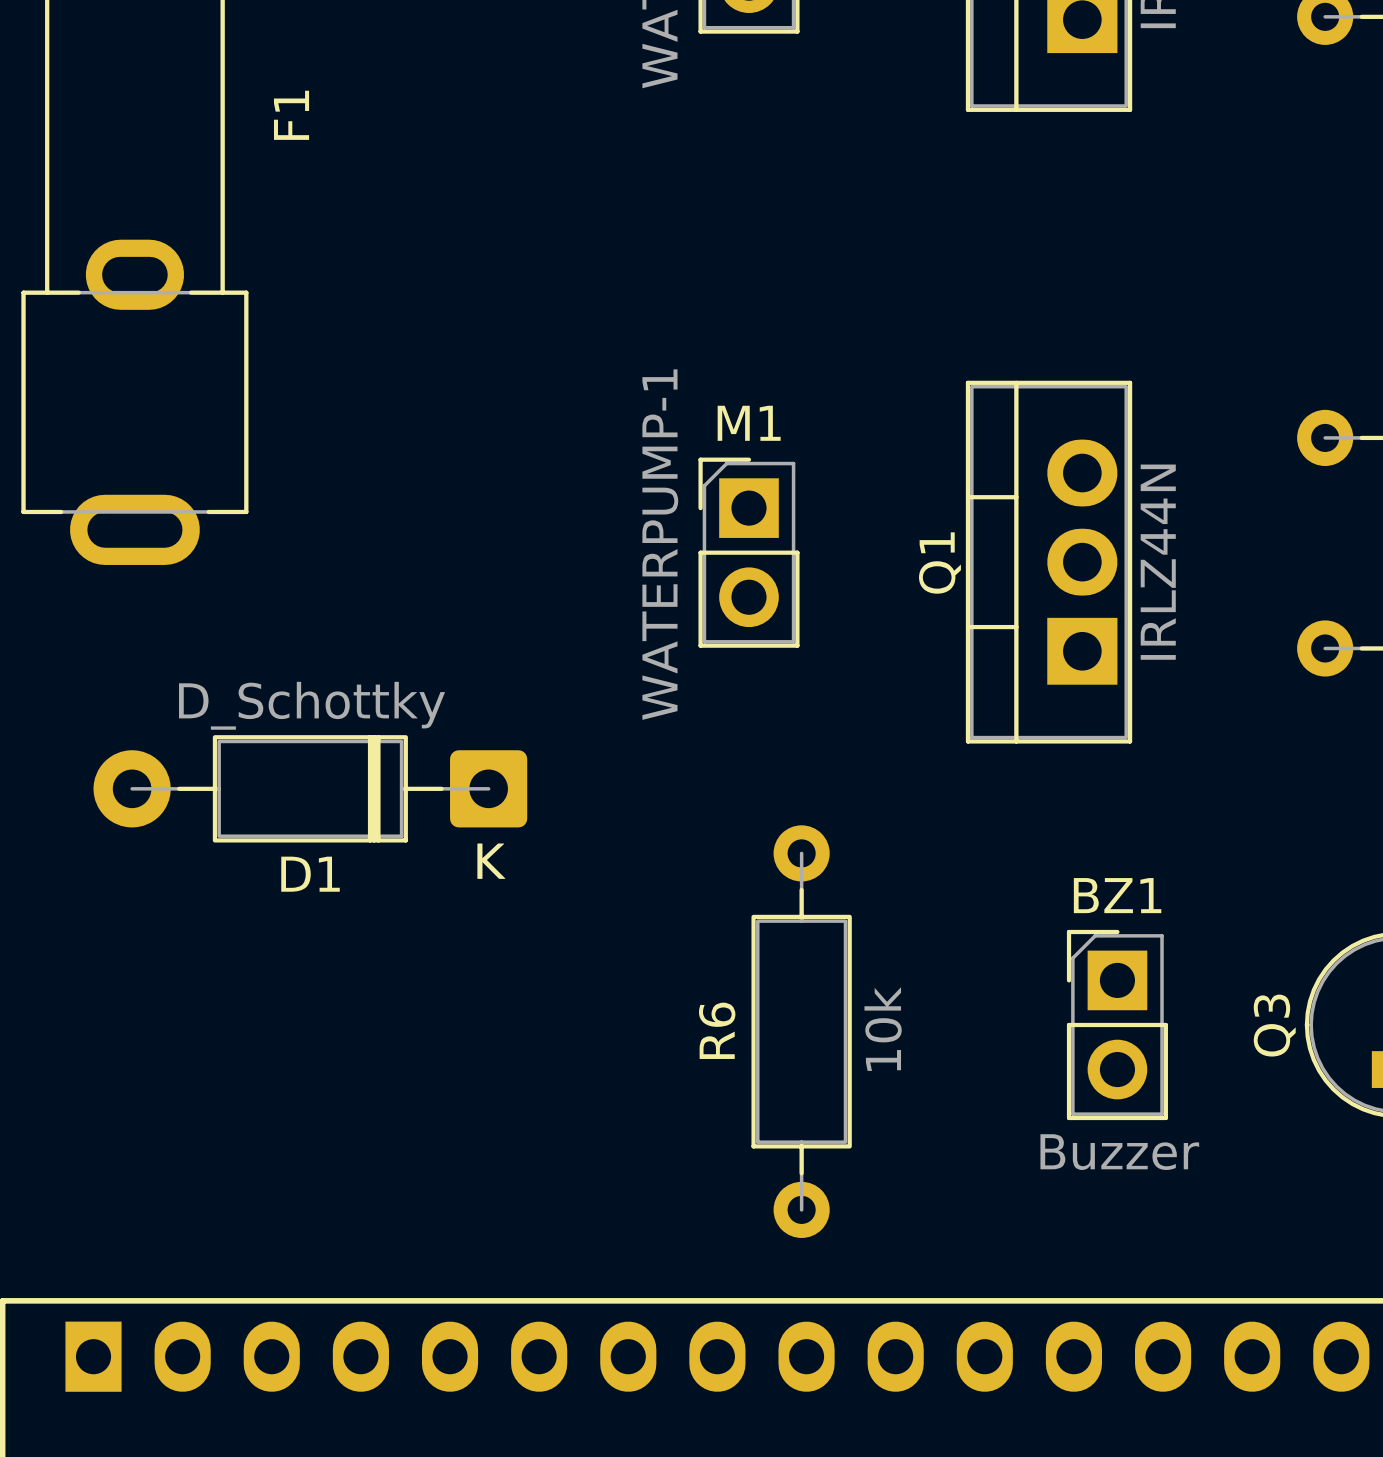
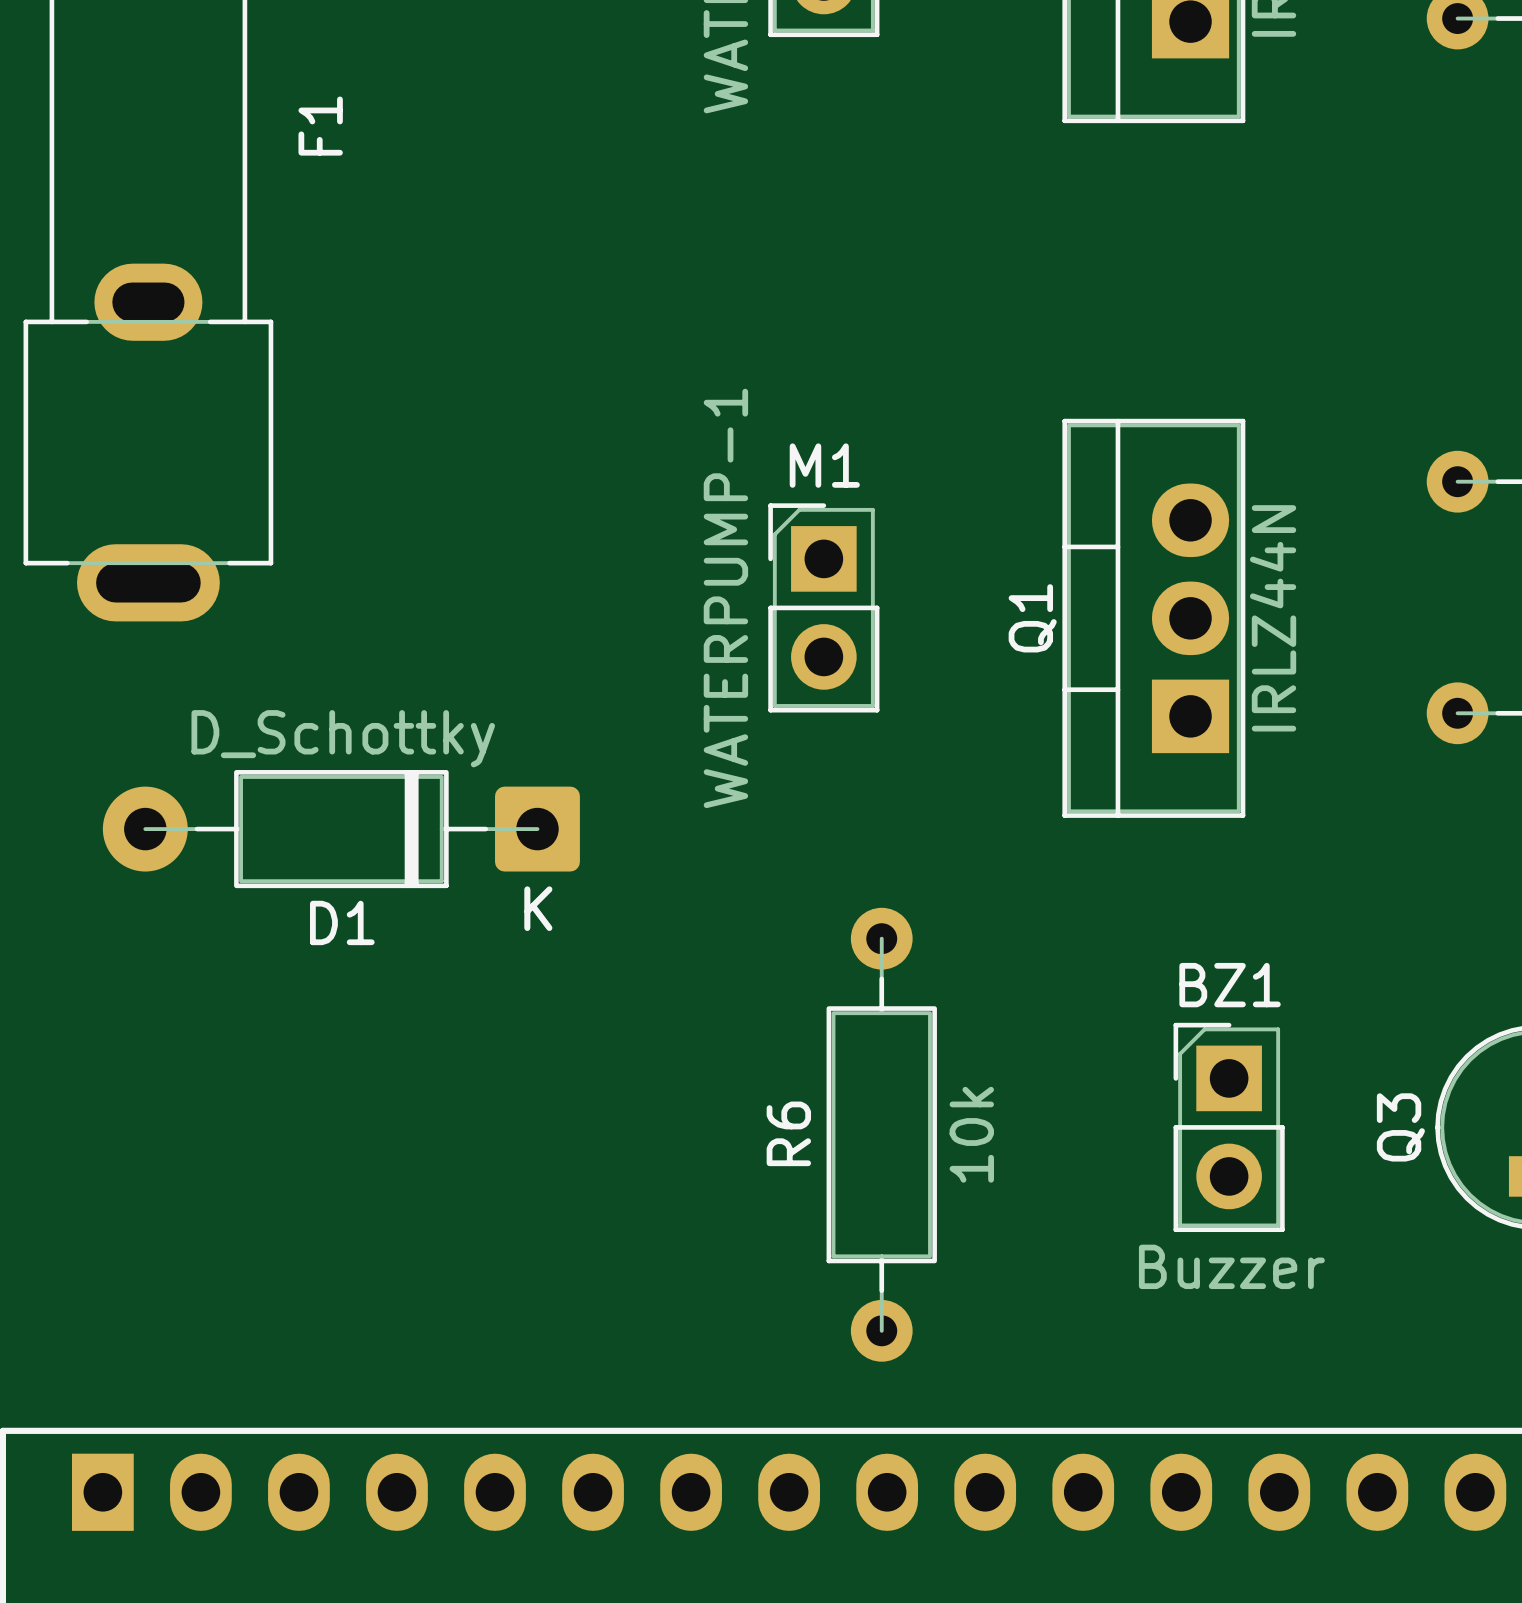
D1 position: (310, 788) -> (341, 829)

